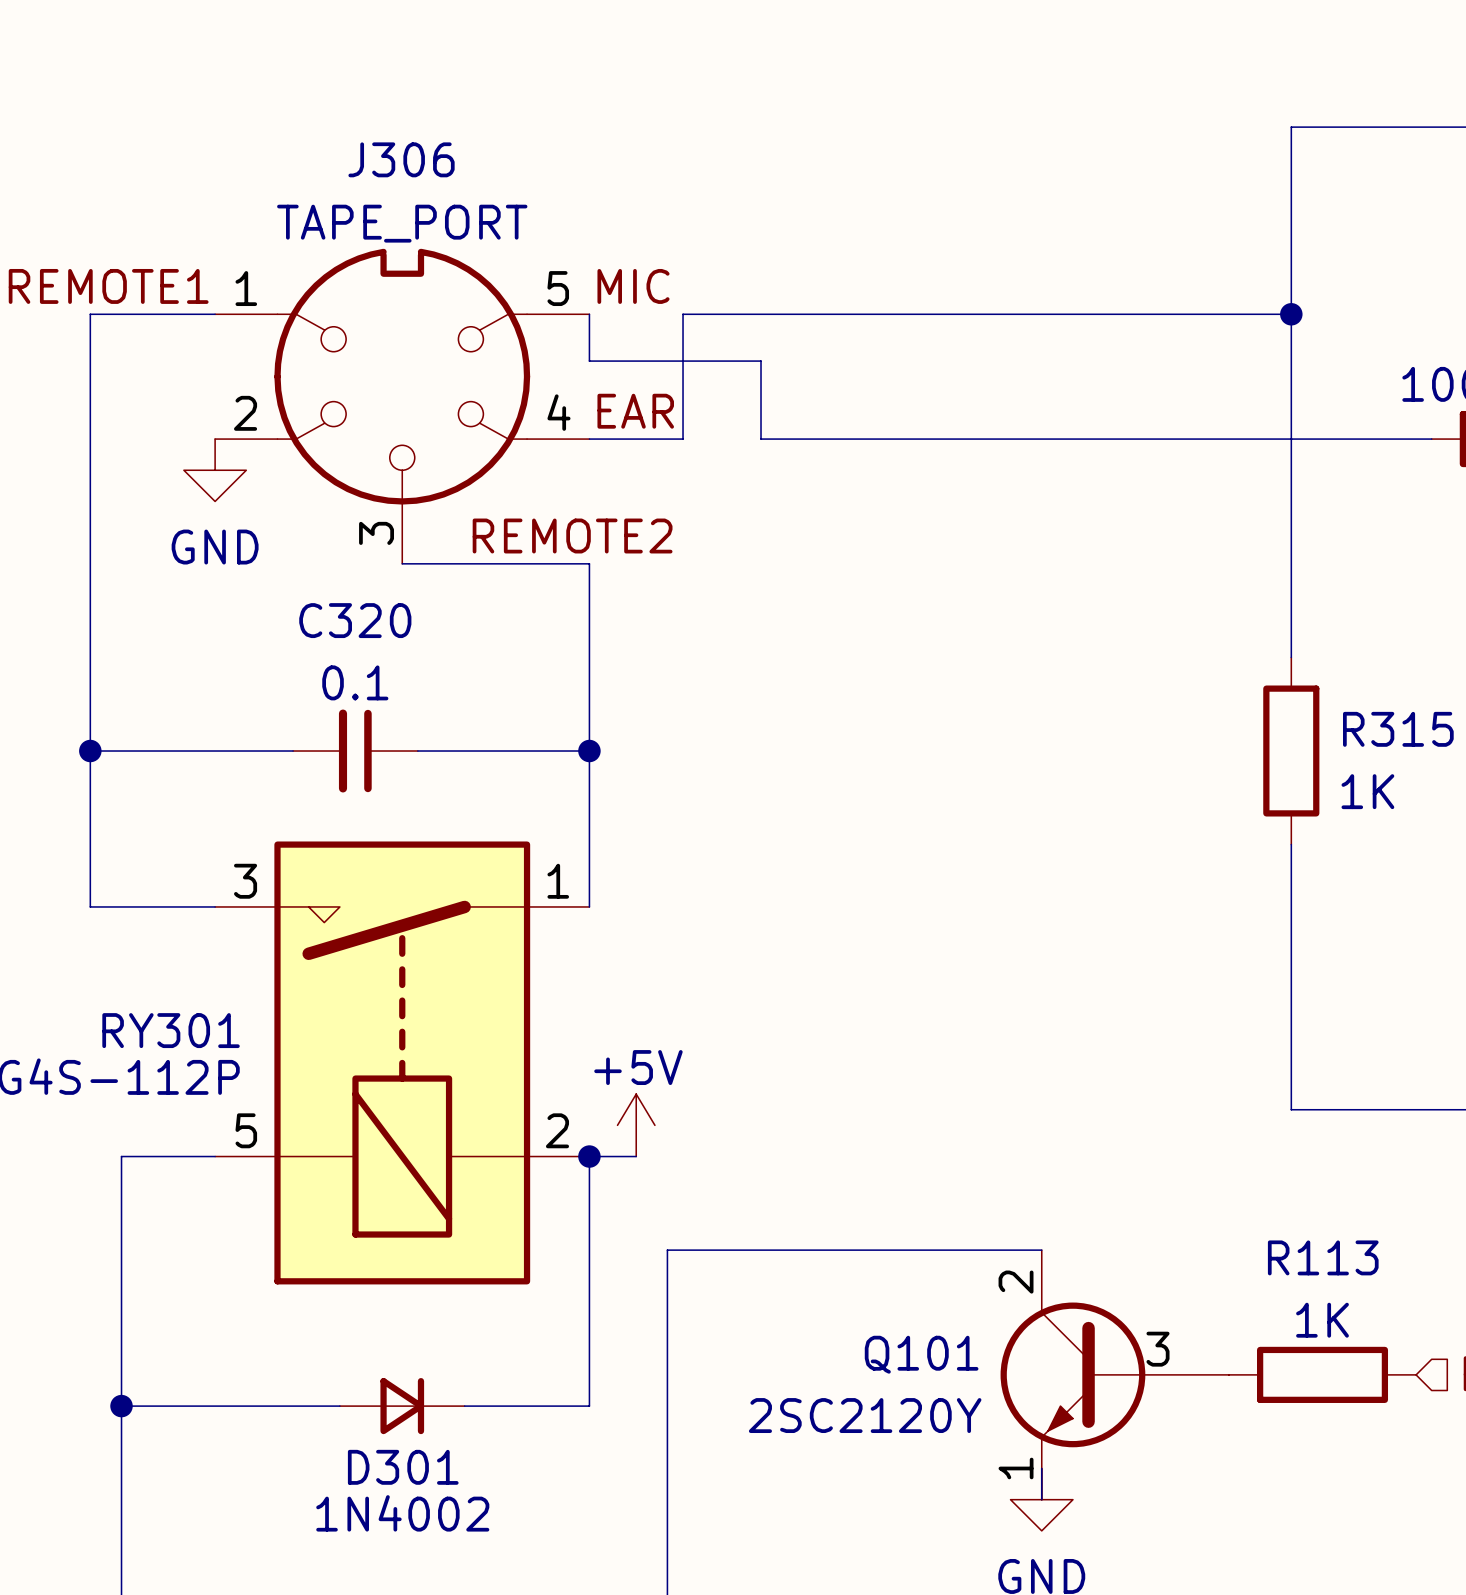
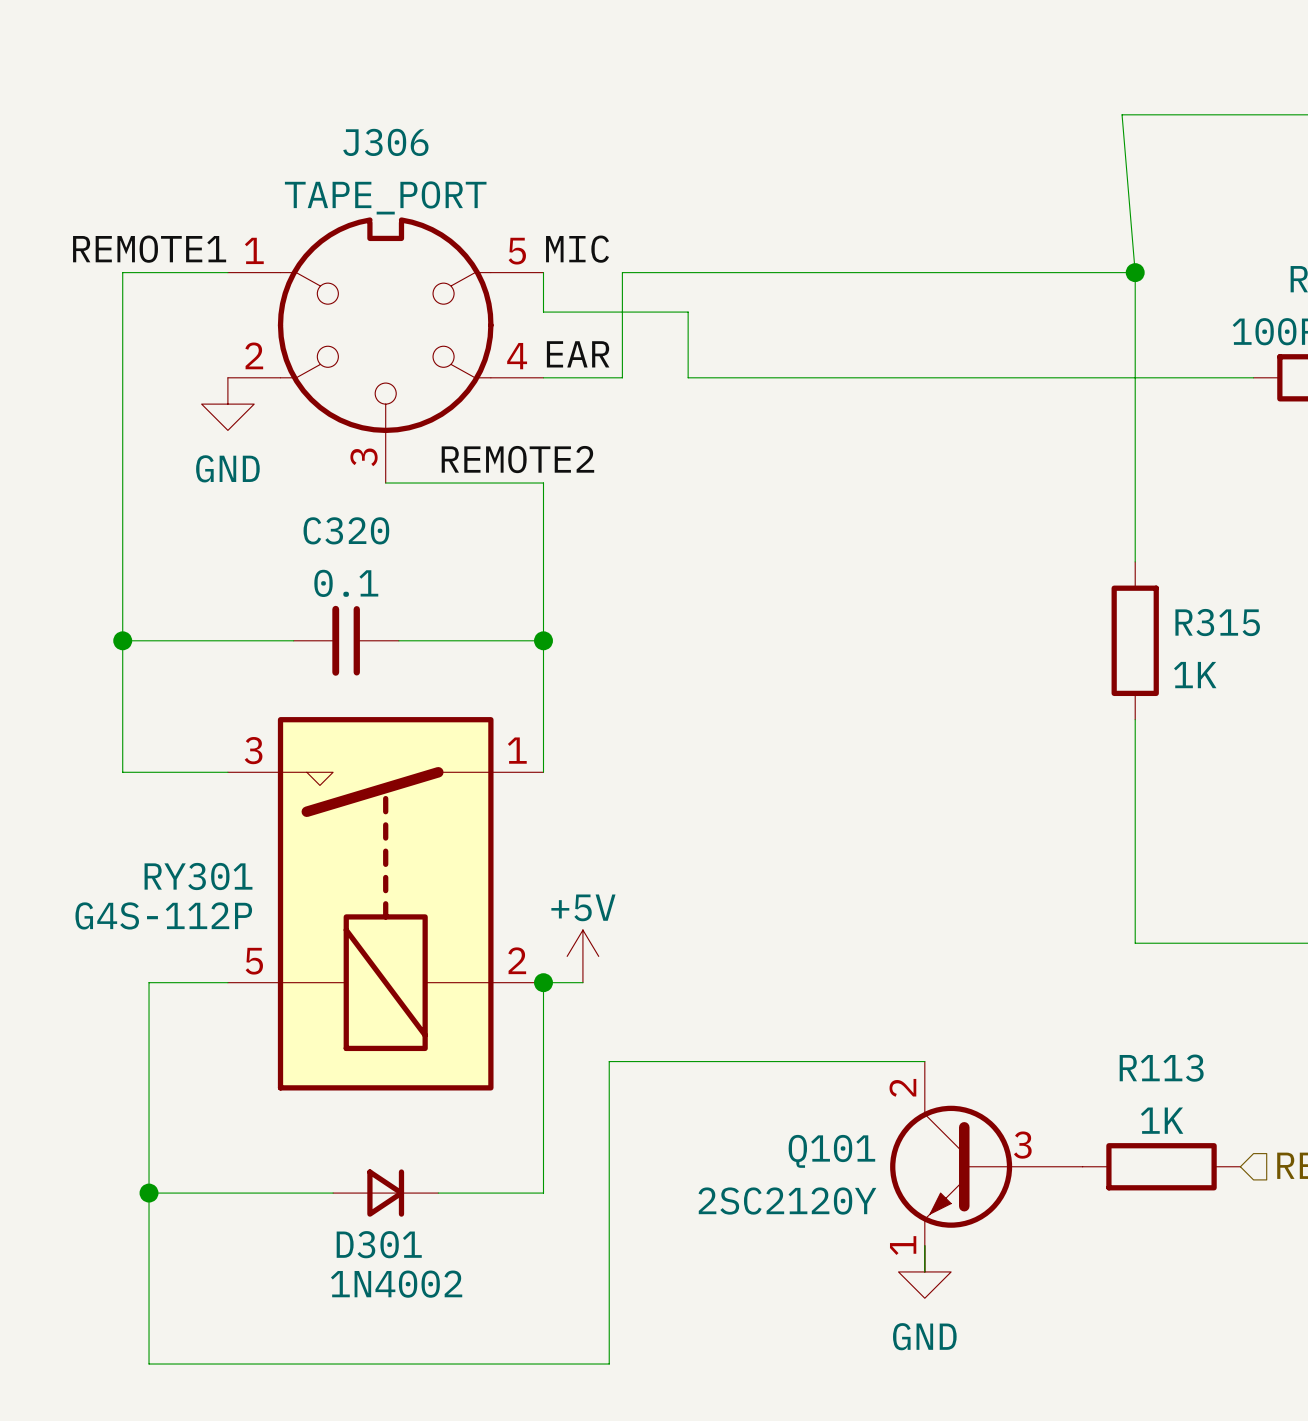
wire: (1291, 127) (1291, 314) -> (1135, 114) (1122, 114) (1135, 272)

